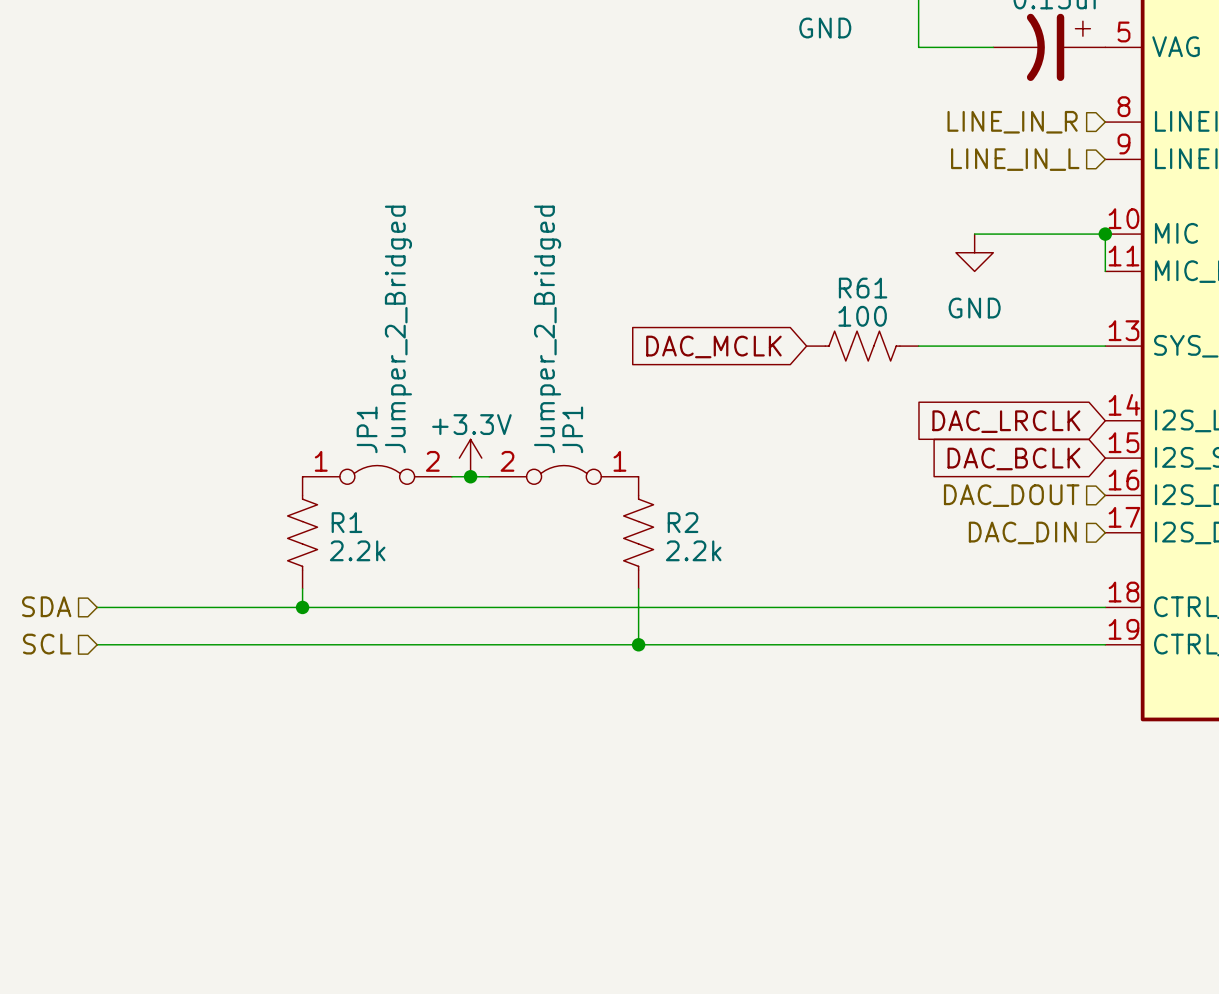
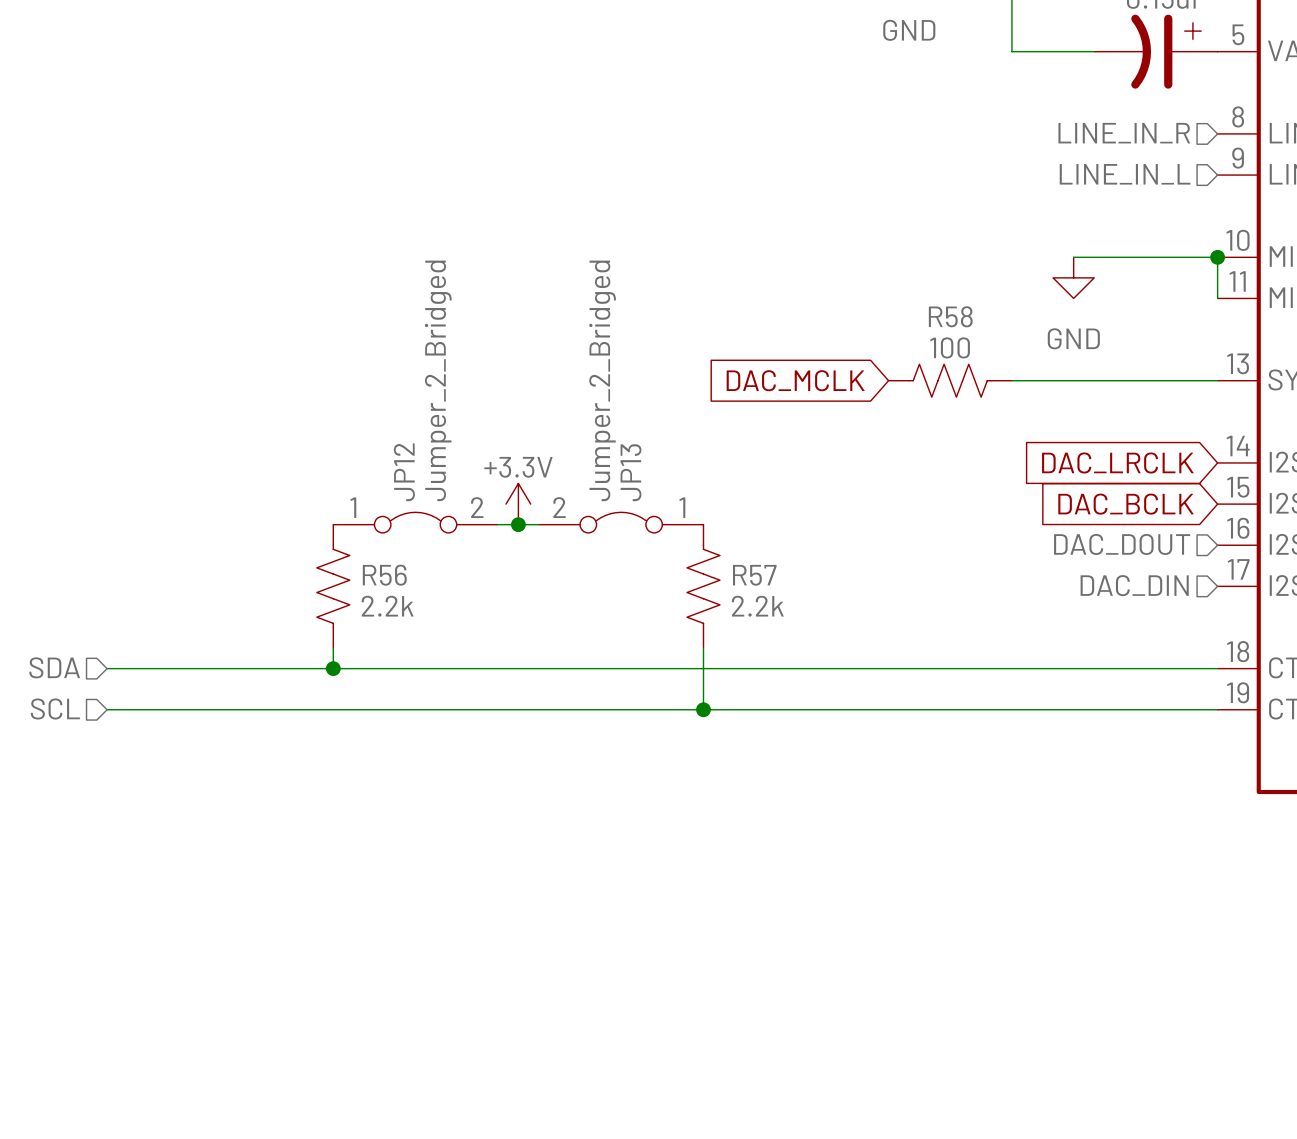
R61 name: R61 (863, 288) -> R58 (950, 316)
JP1 name: JP1 (367, 429) -> JP12 (404, 472)
JP1 name: JP1 (572, 429) -> JP13 (630, 472)
R1 name: R1 (346, 522) -> R56 (384, 575)
R2 name: R2 (683, 522) -> R57 (754, 575)

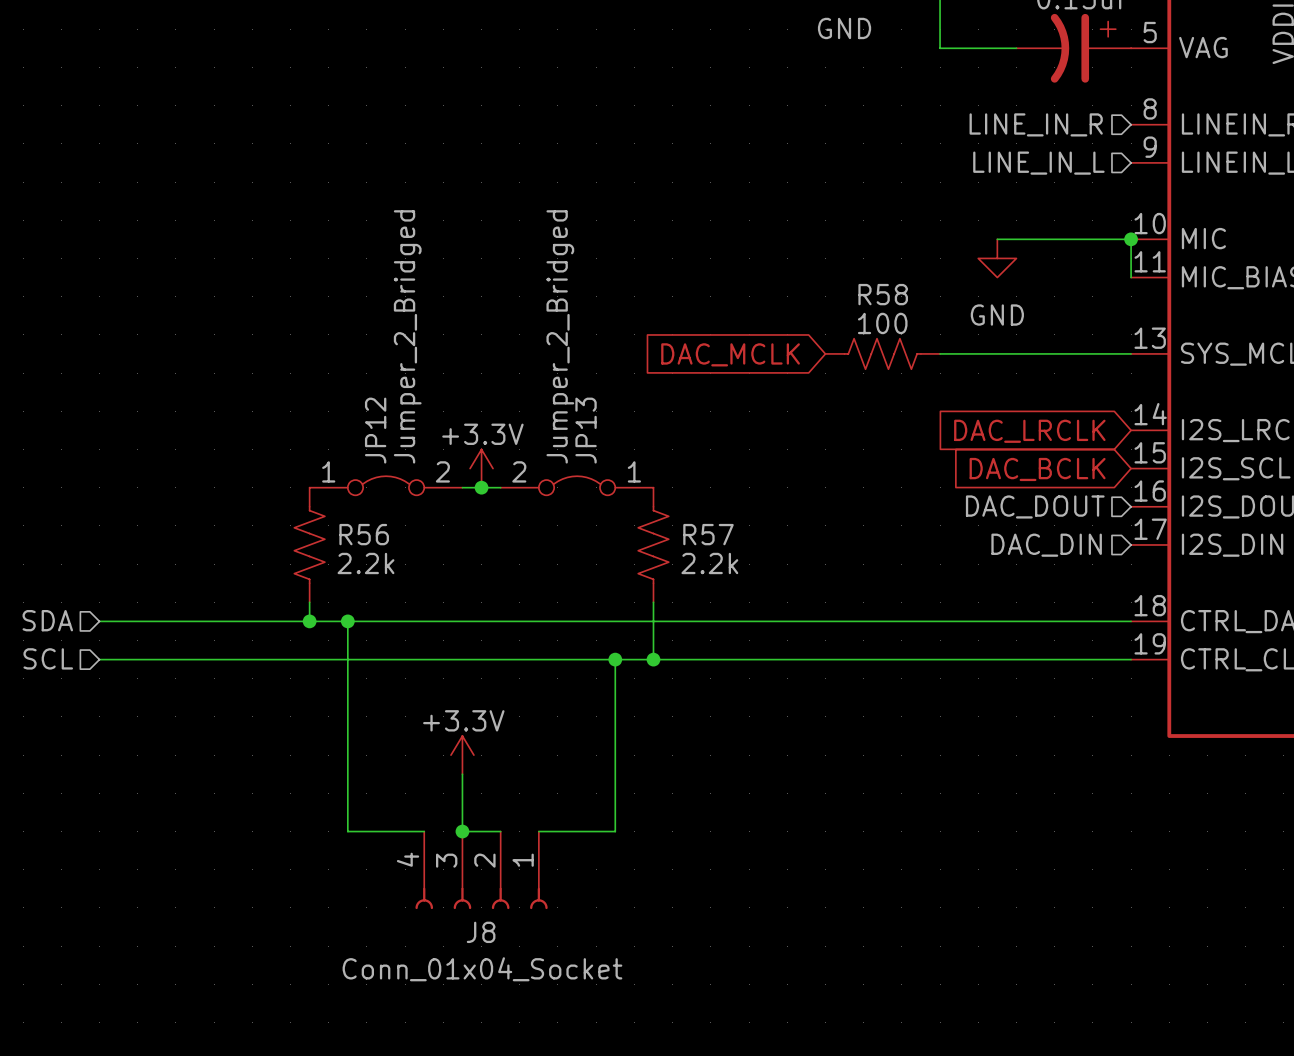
wire: none -> (347, 621) (347, 831) (424, 831)
junction: none -> (347, 621)
wire: none -> (615, 659) (615, 831) (538, 831)
junction: none -> (615, 659)
power symbol: none -> +3.3V (462, 755)
wire: none -> (462, 774) (462, 831) (500, 831)
junction: none -> (462, 831)
J8: none -> Conn_01x04_Socket (481, 870)

